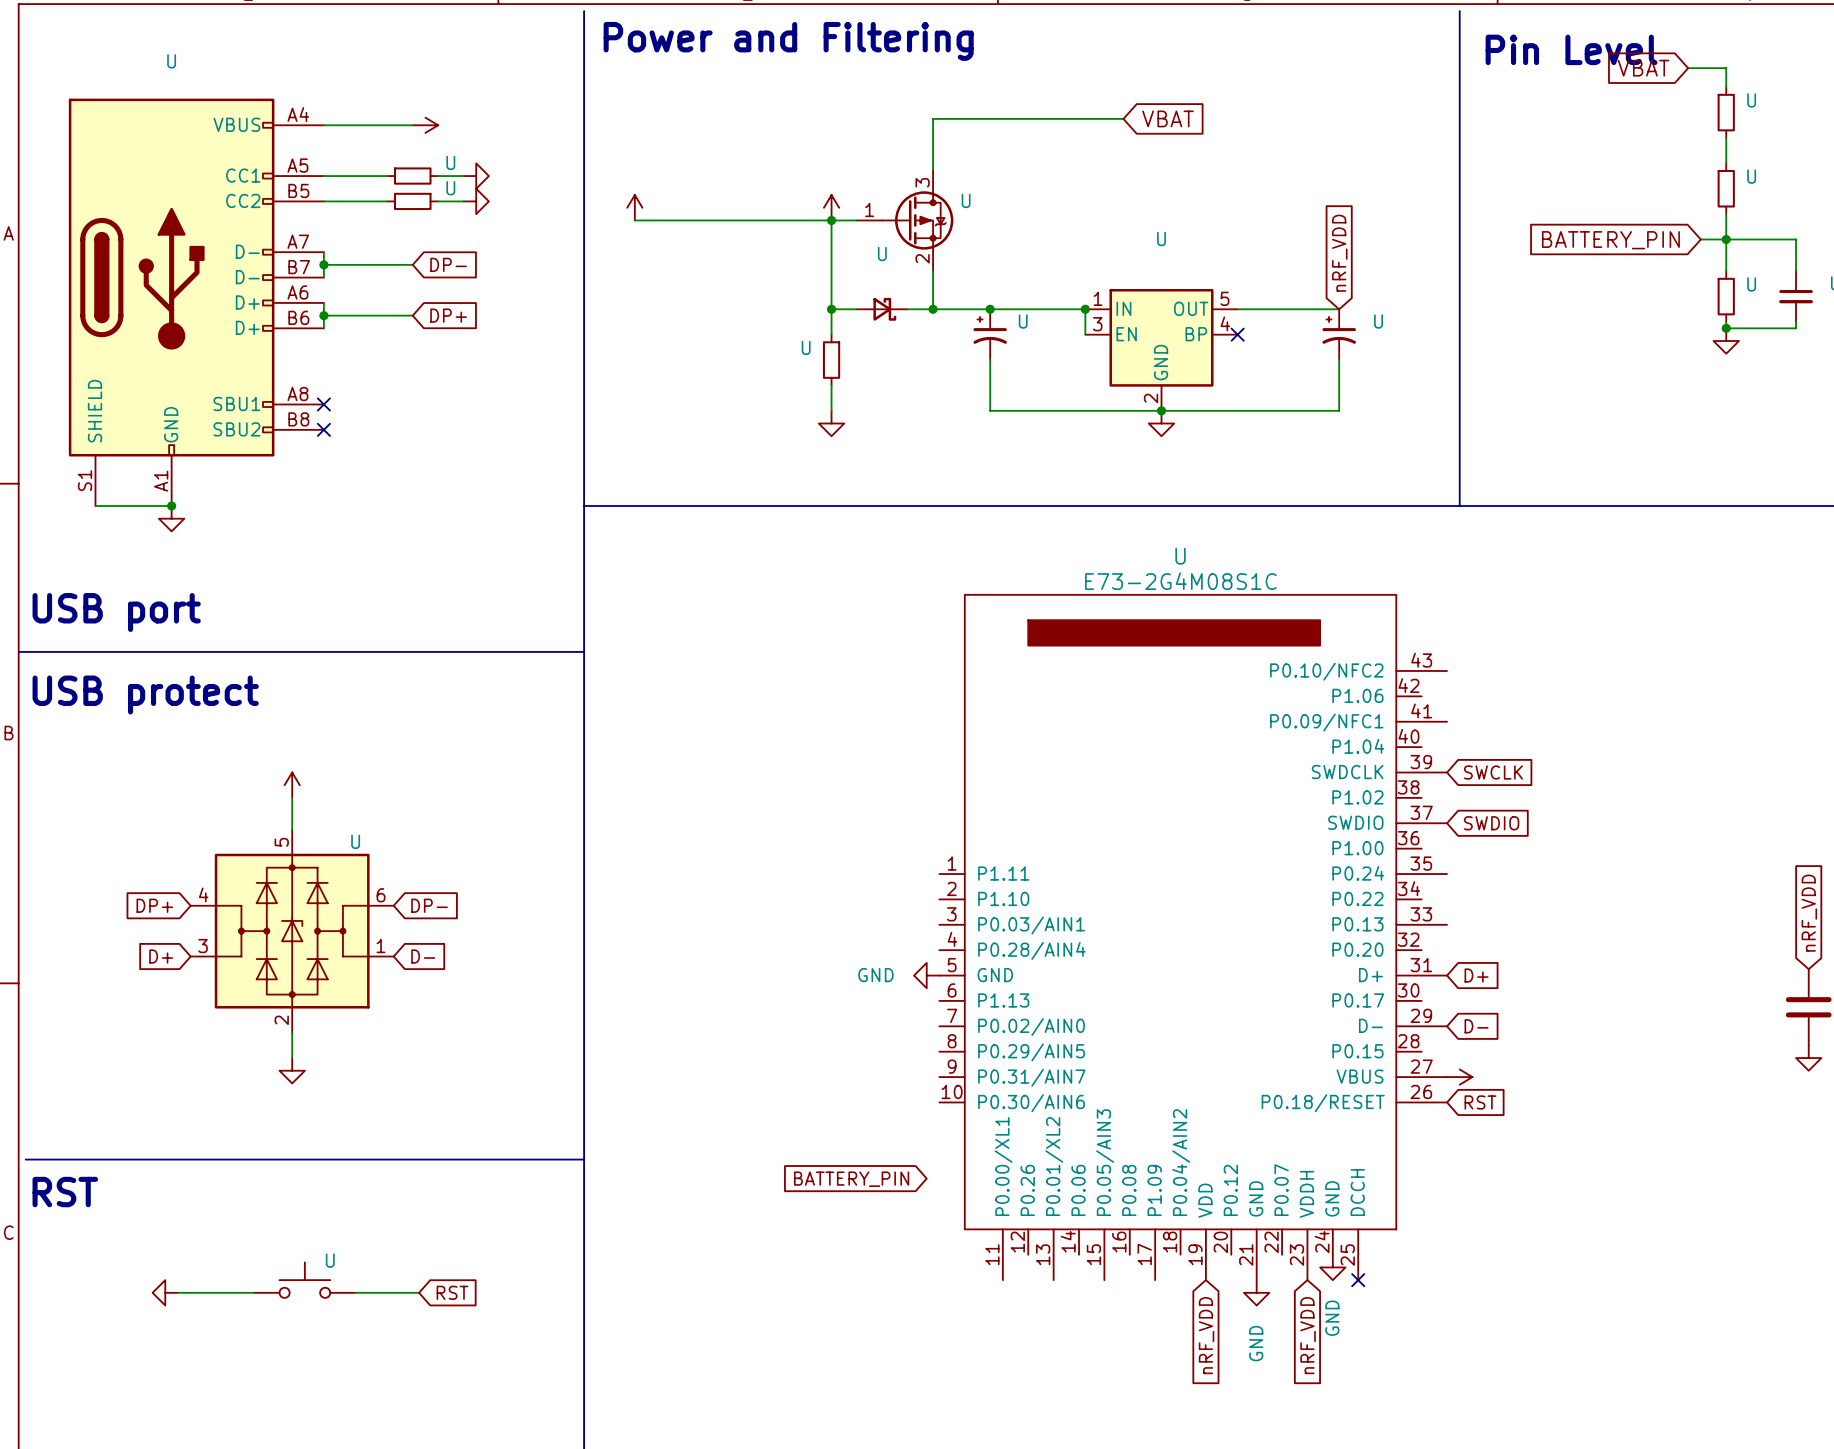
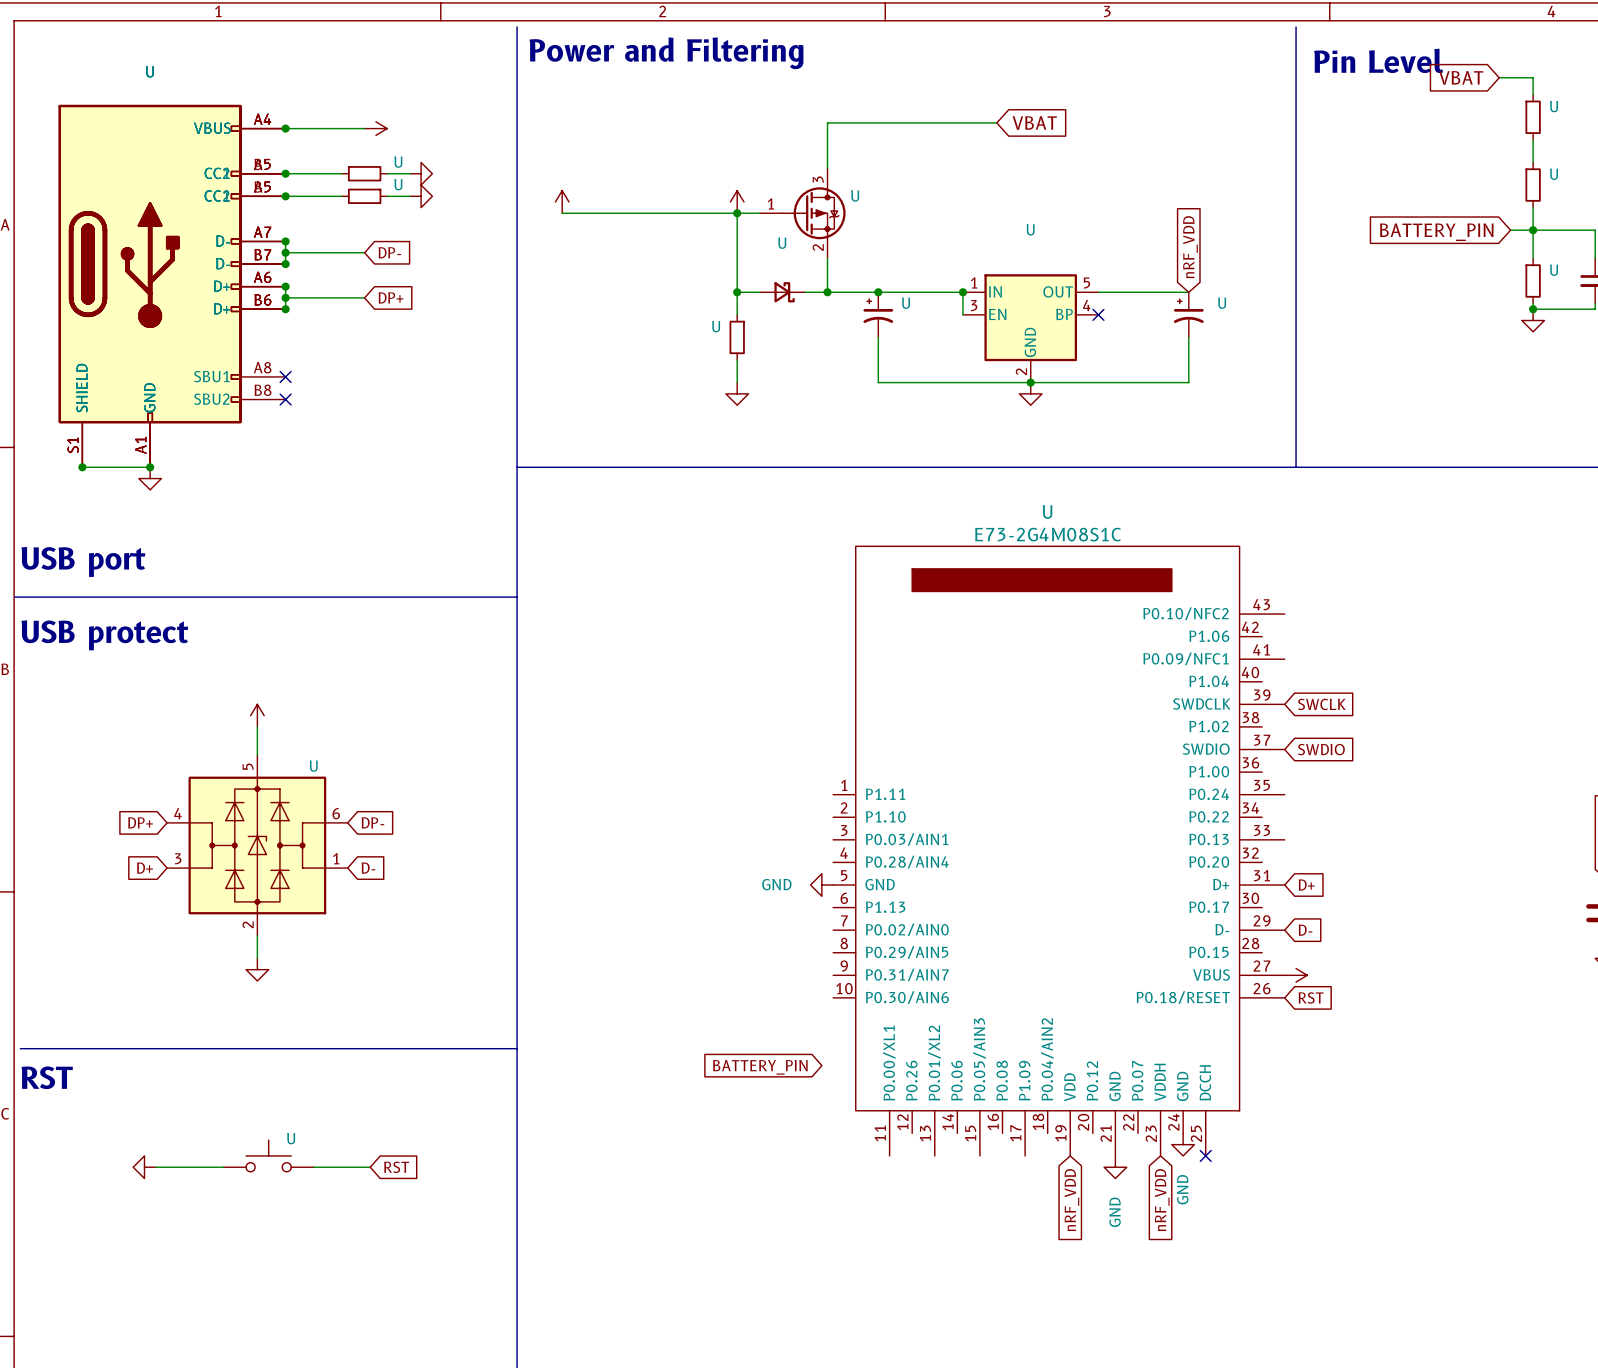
junction: none -> (285, 128)
junction: none -> (285, 173)
junction: none -> (285, 196)
junction: none -> (285, 241)
junction: none -> (285, 264)
U: none -> (172, 286)
junction: none -> (285, 286)
junction: none -> (285, 309)
junction: none -> (82, 467)

